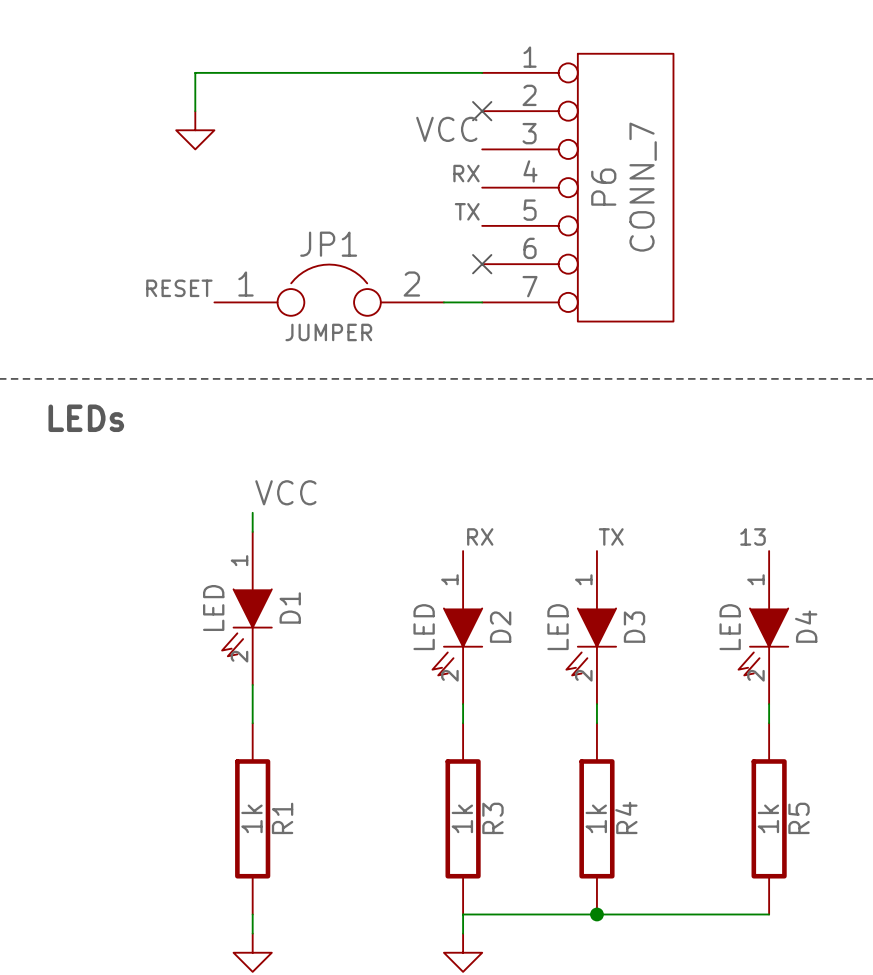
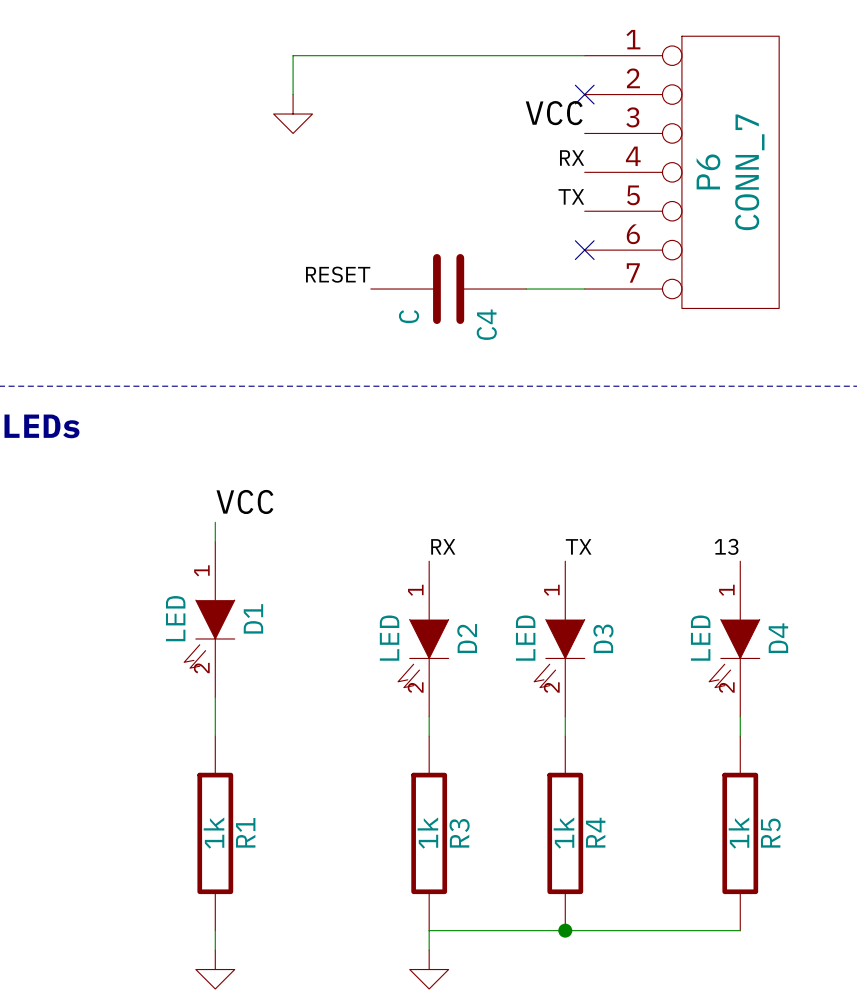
wire: (482, 72) (195, 72) (195, 111) -> (584, 55) (293, 55) (293, 94)
no-connect mark: none -> (584, 94)
no-connect mark: (482, 111) -> none
label position: VCC (446, 129) -> VCC (554, 113)
power symbol position: (195, 130) -> (293, 114)
label position: RX (466, 173) -> RX (572, 158)
P6 position: (577, 187) -> (681, 172)
label position: TX (467, 211) -> TX (571, 196)
no-connect mark: none -> (584, 250)
no-connect mark: (482, 264) -> none
C4: none -> C (448, 289)
wire: none -> (526, 289) (584, 289)
label position: RESET (179, 288) -> RESET (338, 274)
JP1: JUMPER (329, 290) -> none
wire: (443, 302) (482, 302) -> none

